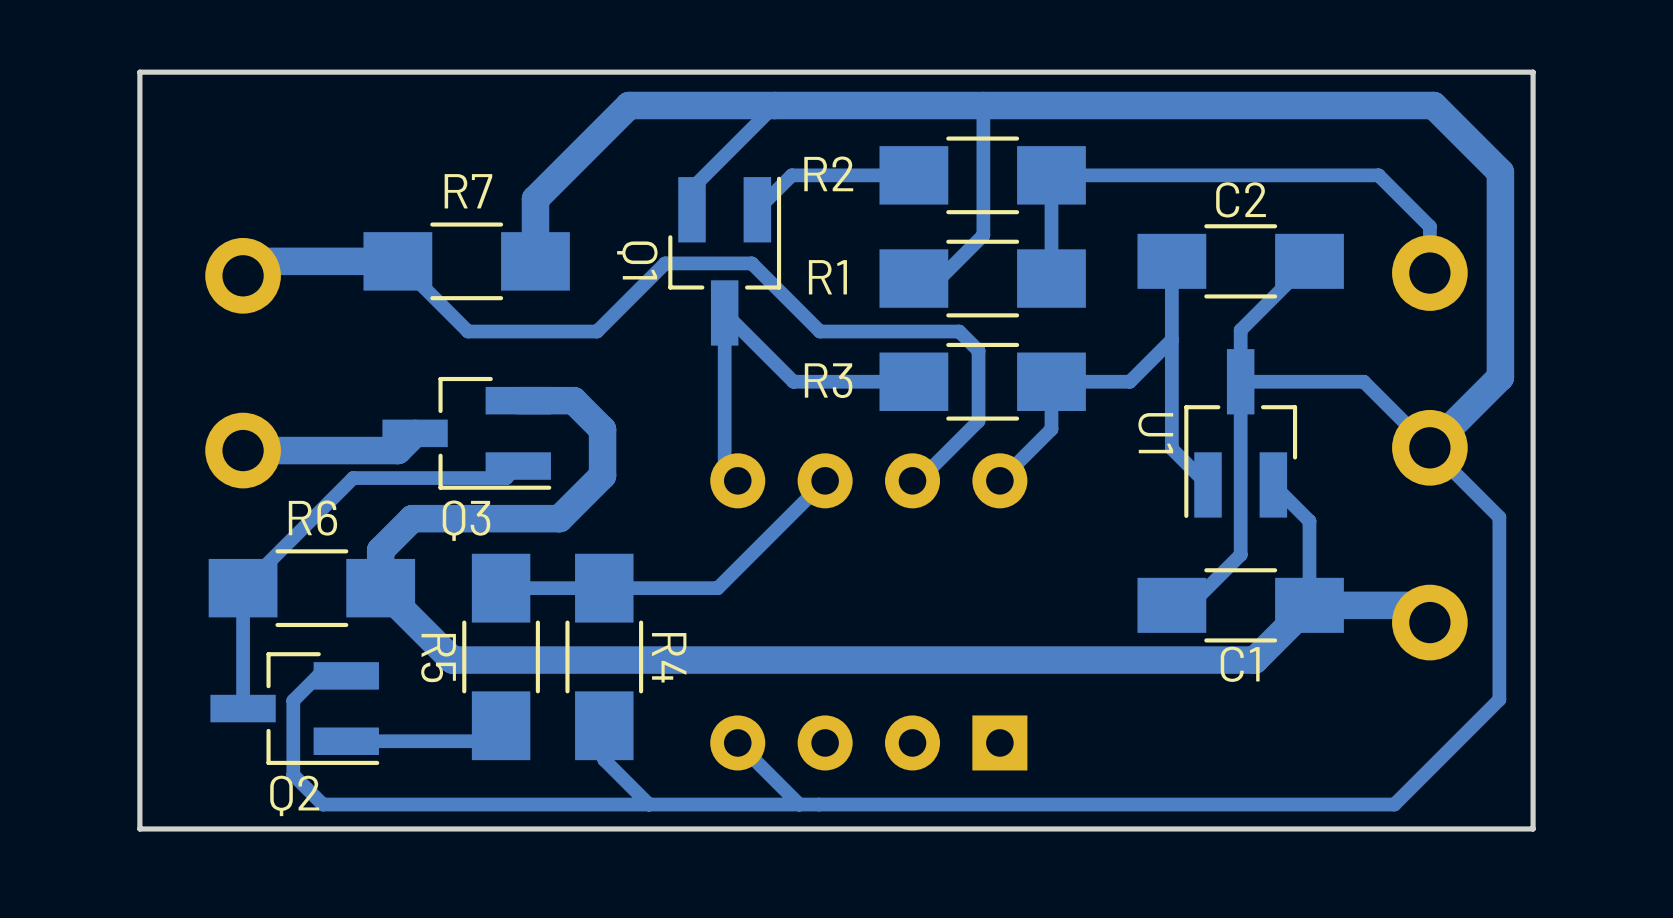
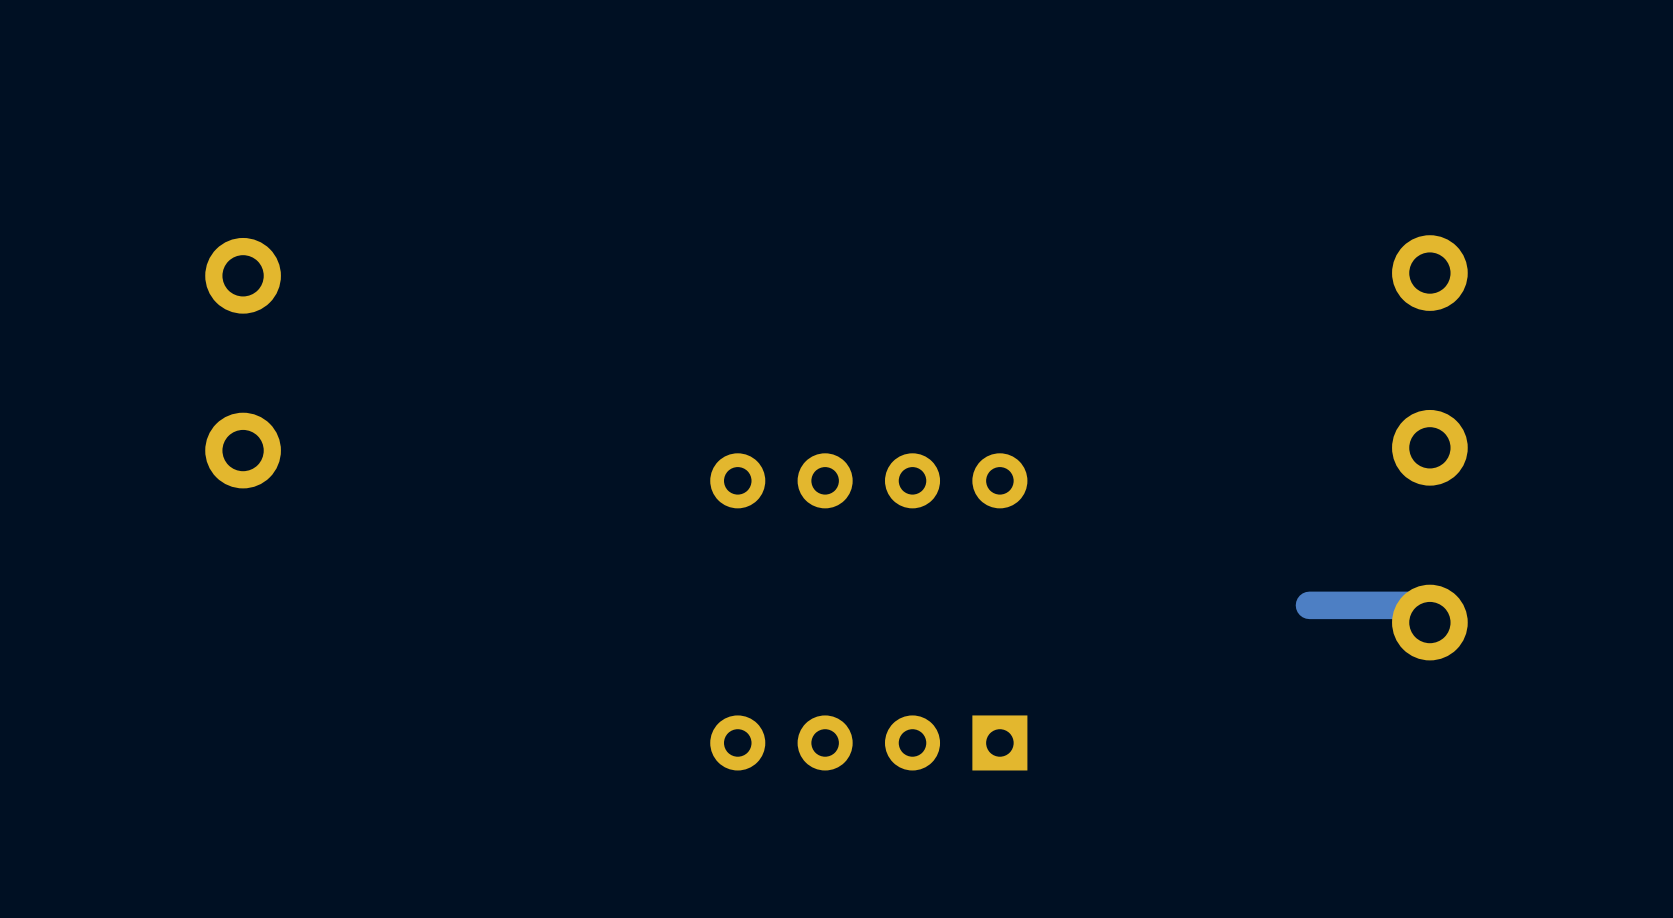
board edge: (1533, 72) (139, 72) (139, 828) (1533, 828) (1533, 72) -> none
track: (774, 105) (692, 188) (692, 209) -> none
track: (983, 105) (983, 235) (940, 278) (913, 278) -> none
track: (913, 175) (791, 175) (757, 209) -> none
R2: (982, 175) -> none
track: (397, 261) (257, 261) (243, 275) -> none
track: (397, 261) (468, 331) (597, 331) (665, 263) (751, 263) (819, 331) (959, 331) (978, 350) (978, 420) (918, 480) (912, 480) -> none
R7: (466, 261) -> none
track: (535, 261) (535, 199) (629, 105) (1433, 105) (1500, 172) (1500, 377) (1429, 447) -> none
Q1: (724, 261) -> none
track: (1171, 261) (1171, 448) (1208, 484) -> none
C2: (1240, 261) -> none
track: (1309, 261) (1240, 330) (1240, 554) (1190, 605) (1171, 605) -> none
track: (1429, 273) (1429, 226) (1378, 175) (1051, 175) (1051, 278) -> none
R1: (982, 278) -> none
track: (1171, 339) (1129, 381) (1051, 381) (1051, 429) (999, 480) -> none
track: (913, 381) (793, 381) (724, 312) (724, 467) (737, 480) -> none
R3: (982, 381) -> none
track: (1240, 381) (1363, 381) (1499, 517) (1499, 699) (1394, 804) (322, 804) (293, 774) (293, 700) (318, 675) (346, 675) -> none
track: (518, 400) (573, 400) (602, 429) (602, 475) (559, 518) (412, 518) (380, 550) (380, 588) (452, 660) (1254, 660) (1309, 605) (1309, 521) (1273, 484) -> none
track: (415, 433) (397, 450) (243, 450) -> none
Q3: (466, 433) -> none
U1: (1240, 433) -> none
track: (518, 466) (506, 478) (353, 478) (243, 588) (243, 708) -> none
track: (825, 480) (717, 588) (501, 588) -> none
R6: (311, 588) -> none
C1: (1240, 605) -> none
R5: (501, 656) -> none
R4: (604, 656) -> none
Q2: (294, 708) -> none
track: (501, 725) (485, 741) (346, 741) -> none
track: (604, 725) (604, 759) (649, 804) -> none
track: (737, 742) (799, 804) -> none

